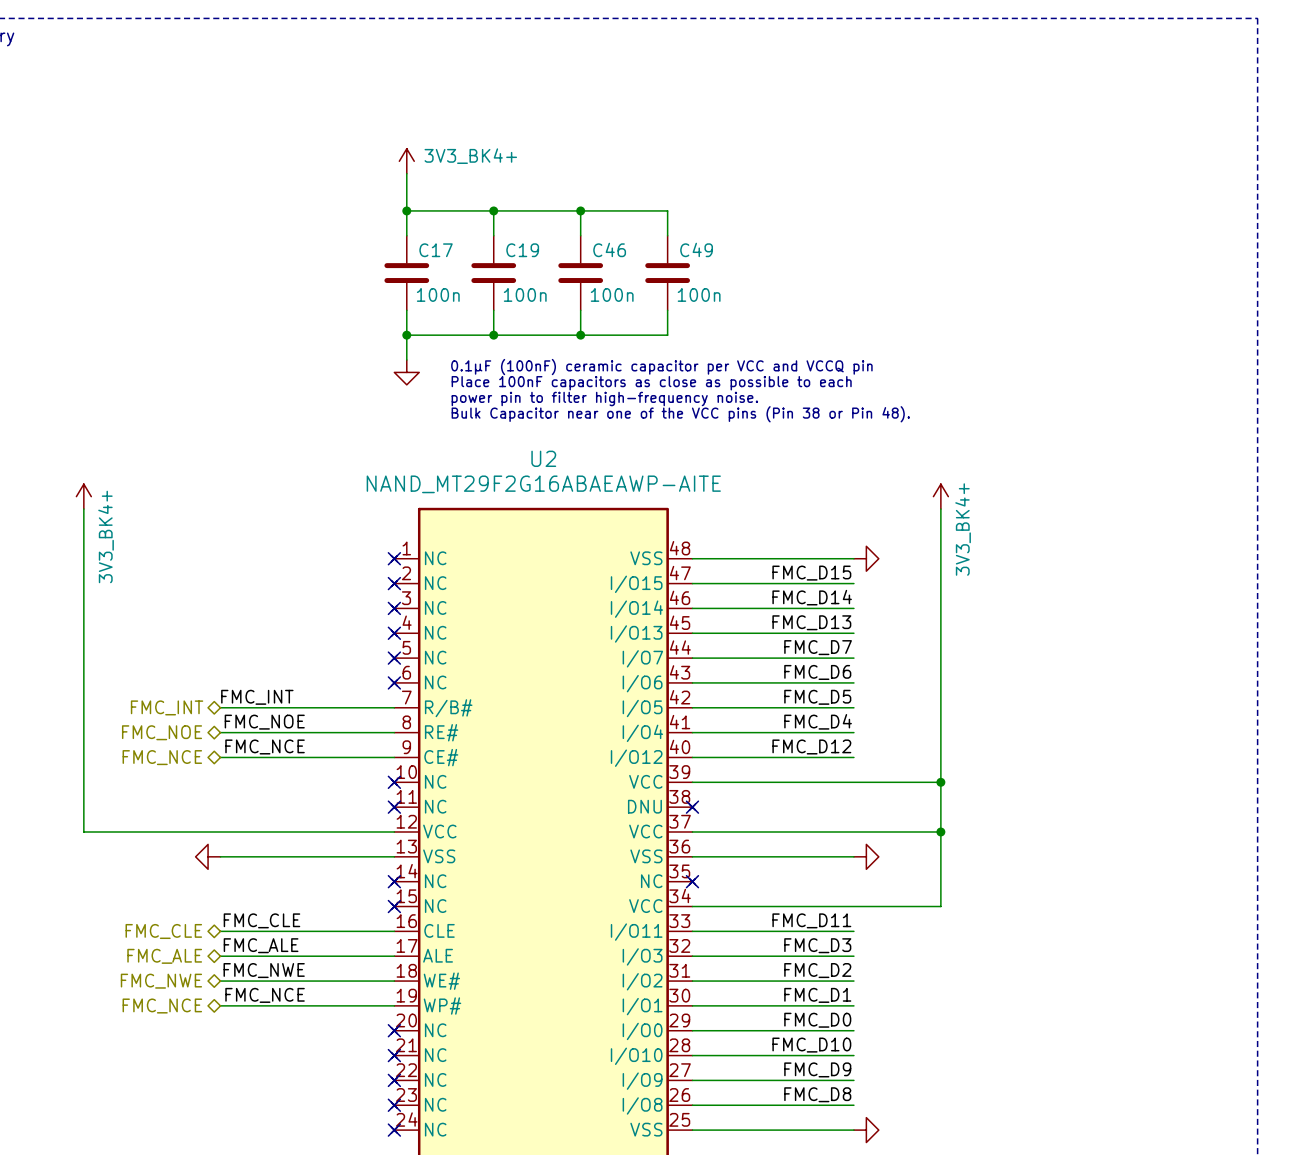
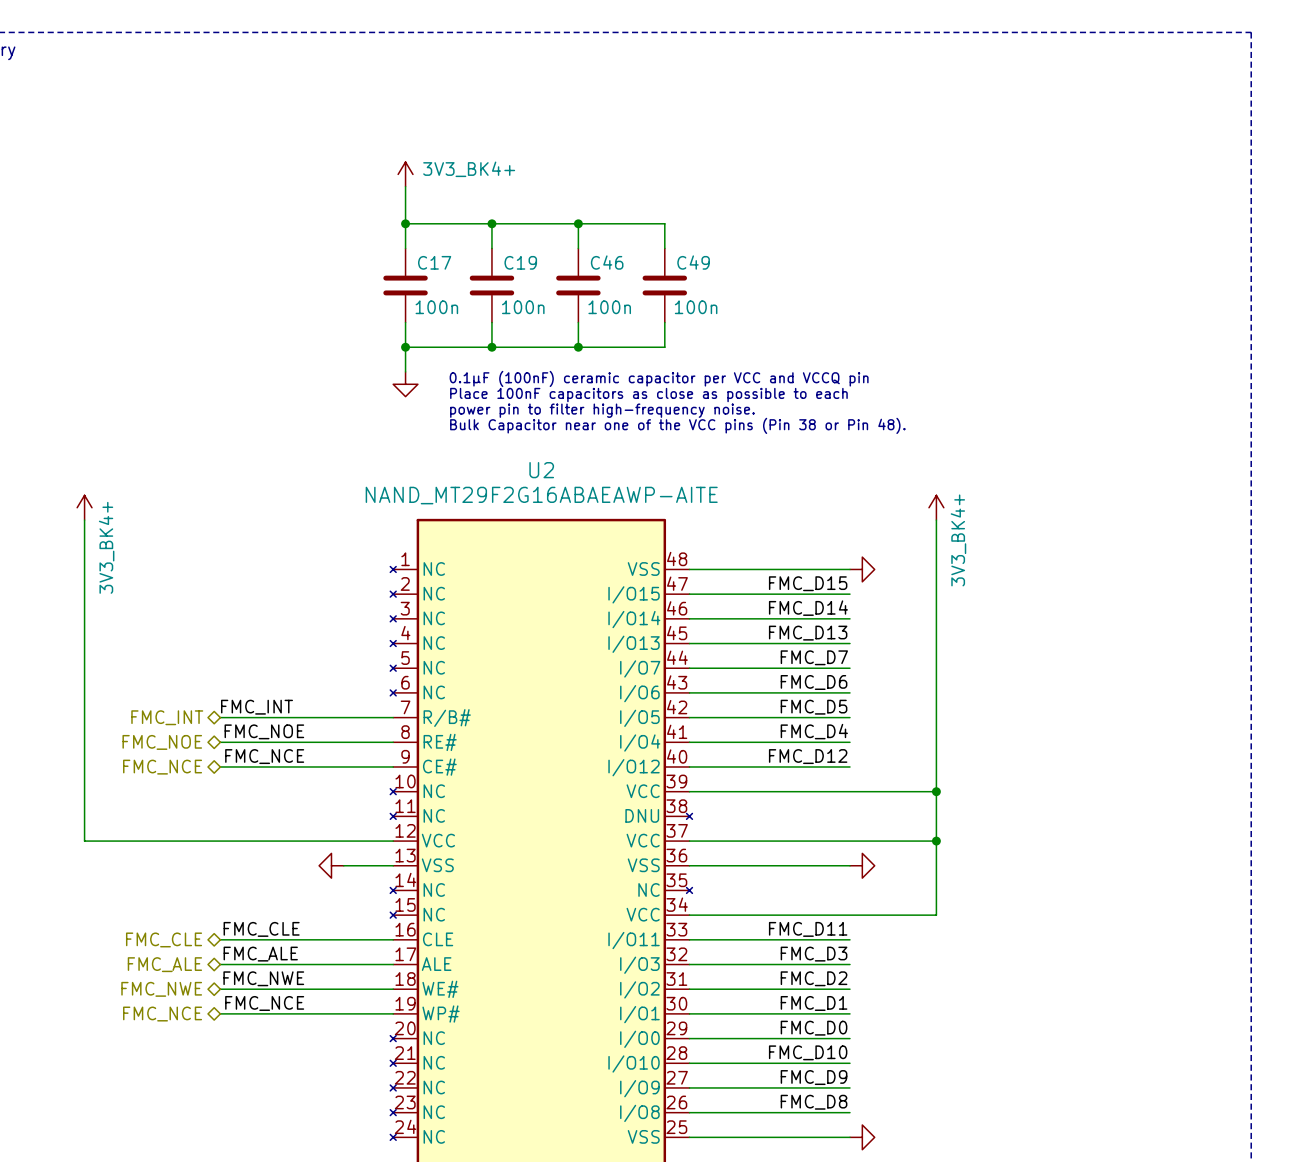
no-connect mark: (394, 558) -> none
no-connect mark: (394, 583) -> none
no-connect mark: (394, 608) -> none
no-connect mark: (394, 633) -> none
no-connect mark: (394, 658) -> none
no-connect mark: (394, 682) -> none
no-connect mark: (394, 782) -> none
no-connect mark: (394, 807) -> none
no-connect mark: (692, 807) -> none
power symbol position: (208, 856) -> (331, 865)
wire: (220, 856) (344, 856) -> none
no-connect mark: (394, 881) -> none
no-connect mark: (692, 881) -> none
no-connect mark: (394, 906) -> none
no-connect mark: (394, 1030) -> none
no-connect mark: (394, 1055) -> none
no-connect mark: (394, 1080) -> none
no-connect mark: (394, 1105) -> none
no-connect mark: (394, 1130) -> none

